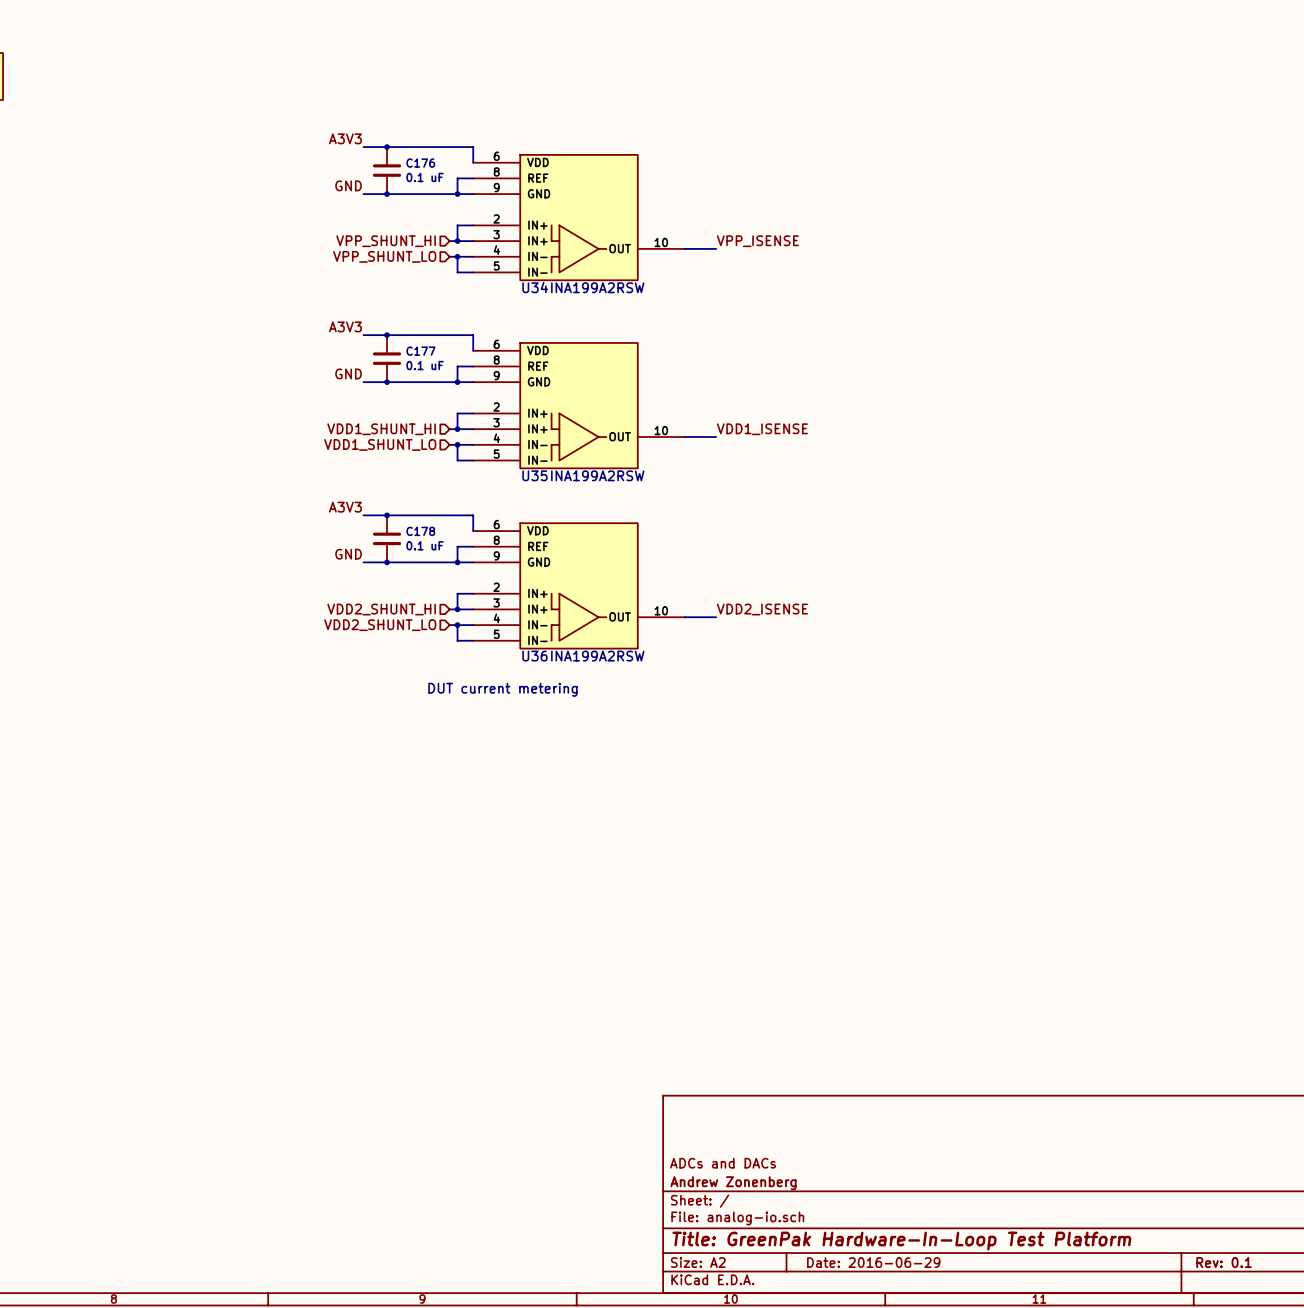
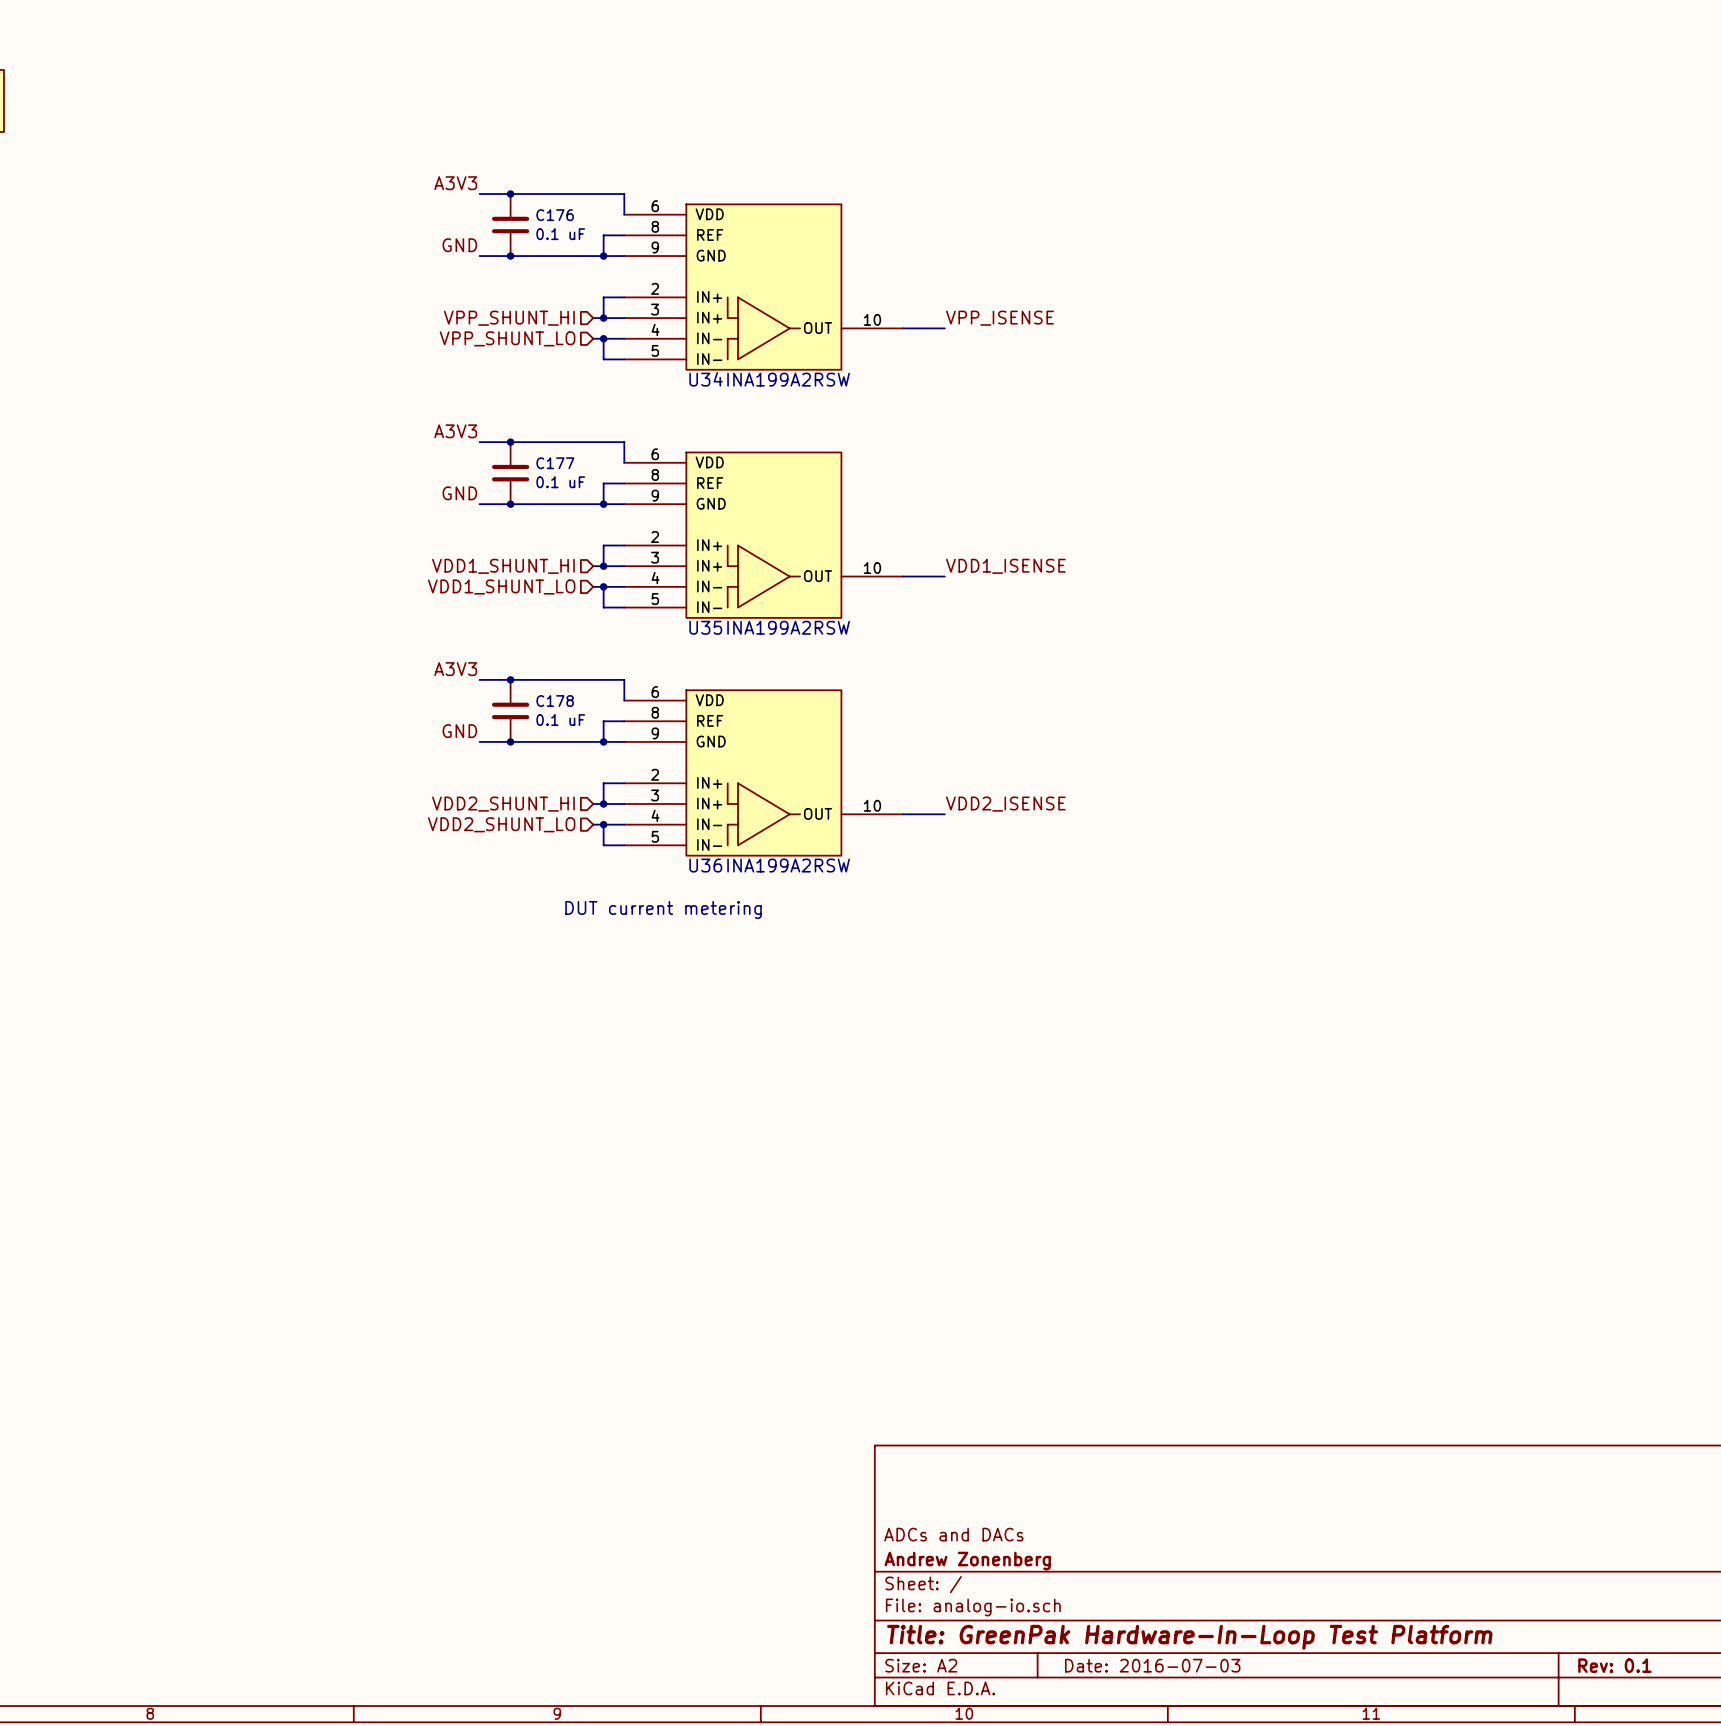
title block: Date: 2016-06-29 (873, 1262) -> Date: 2016-07-03 (1152, 1665)

